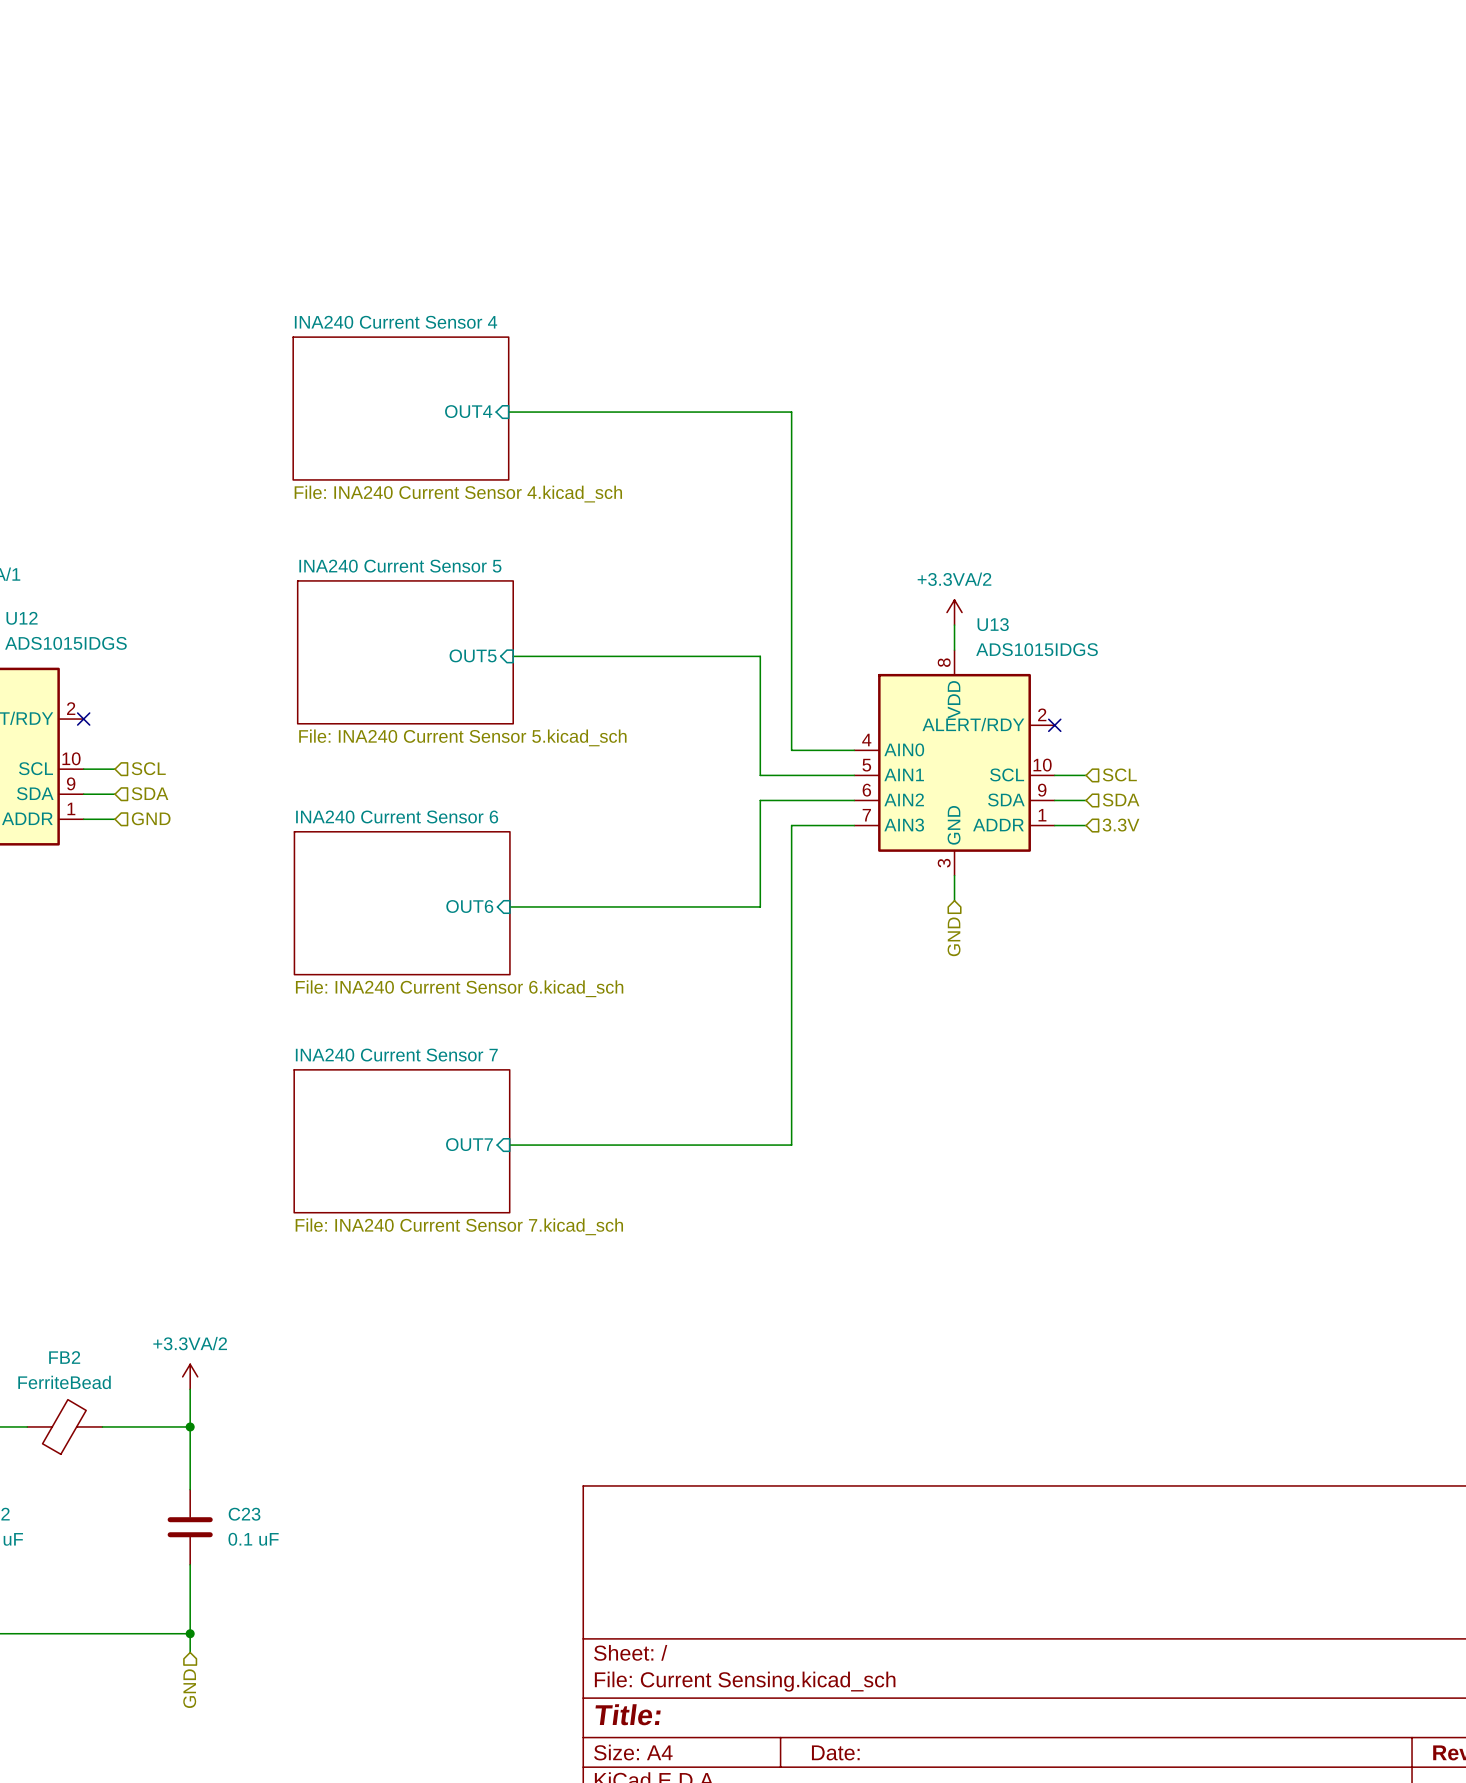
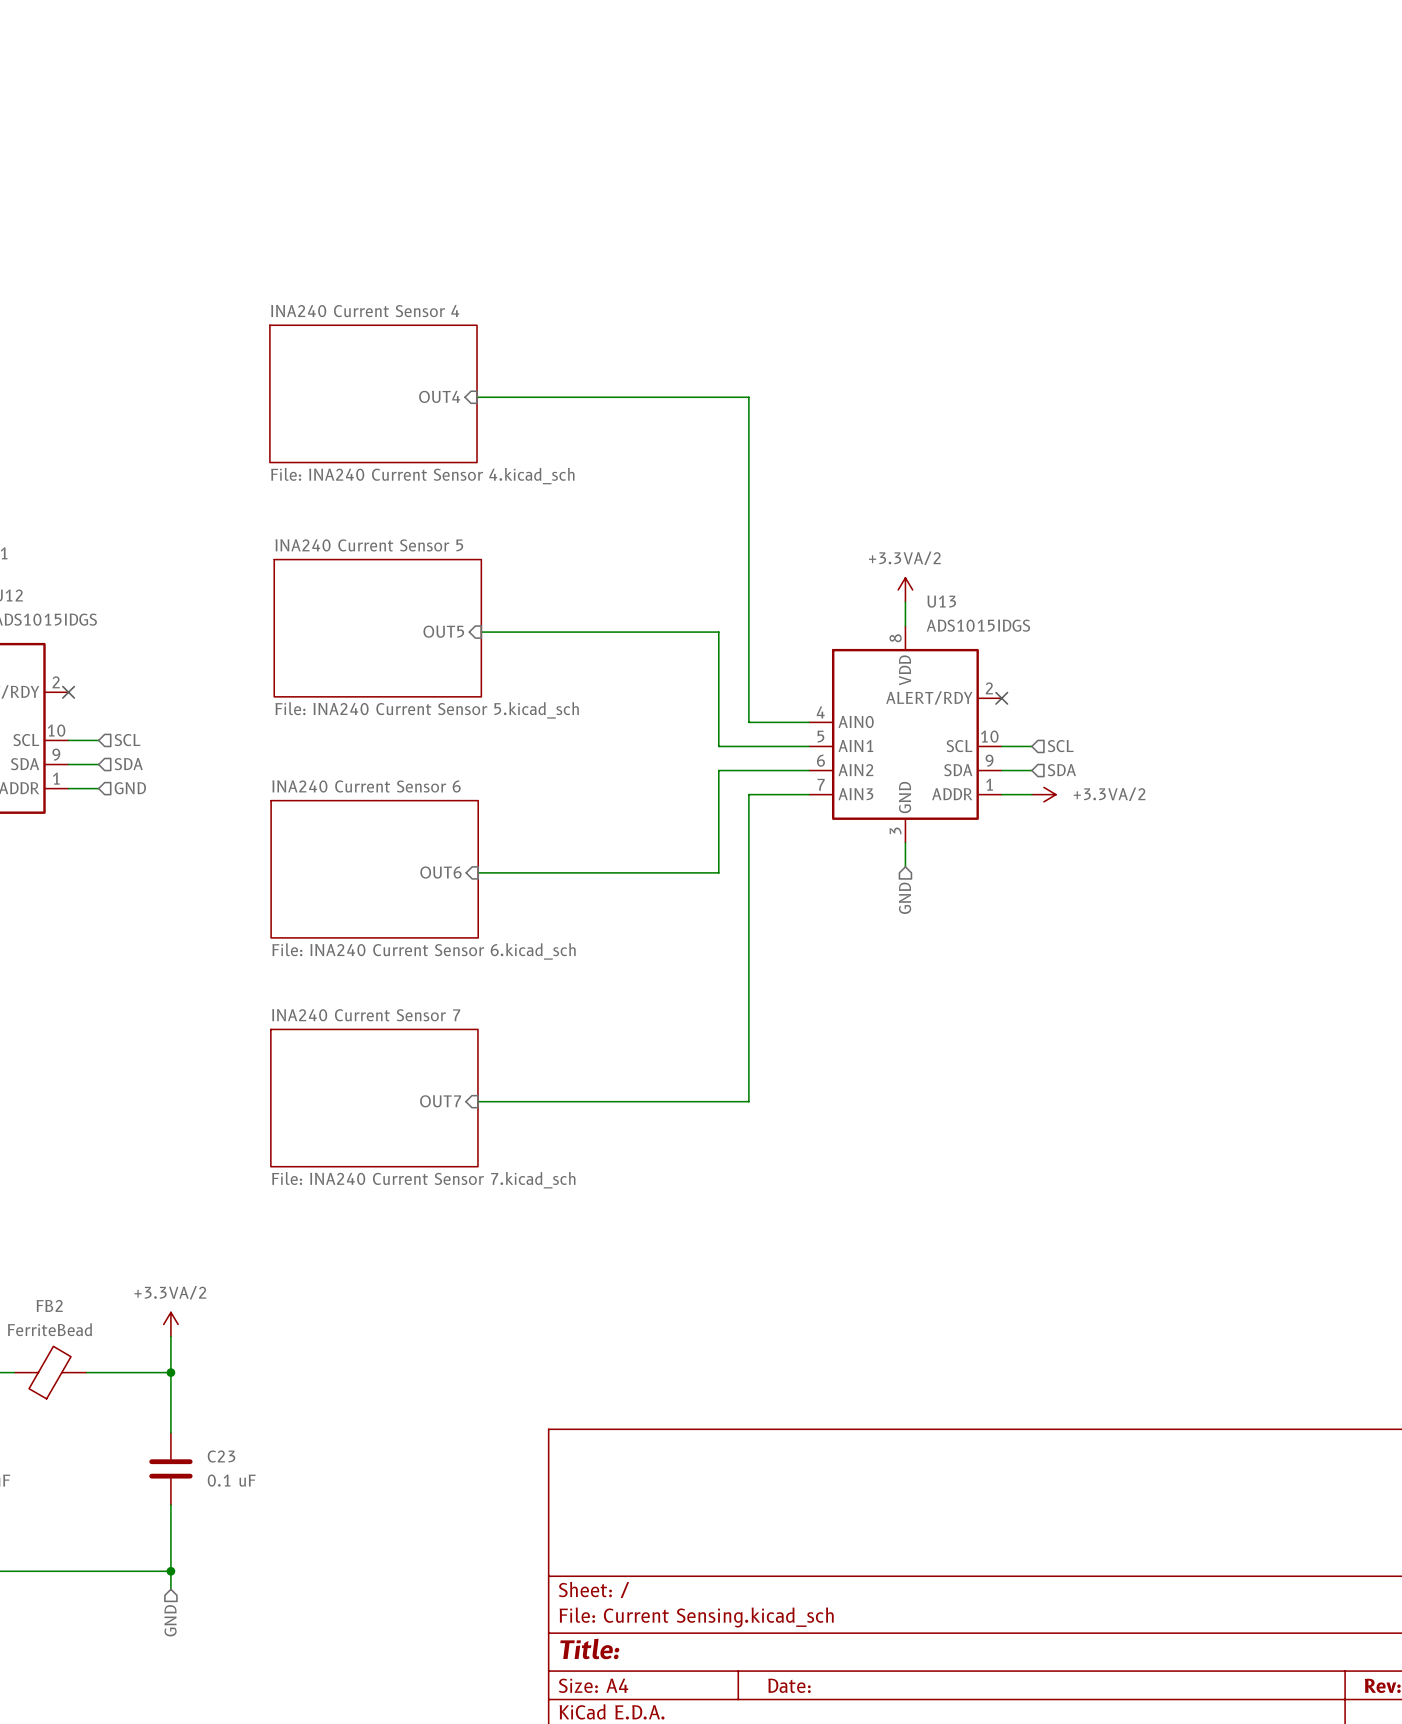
power symbol: none -> +3.3VA/2 (1043, 794)
hierarchical label: 3.3V (1121, 825) -> none

